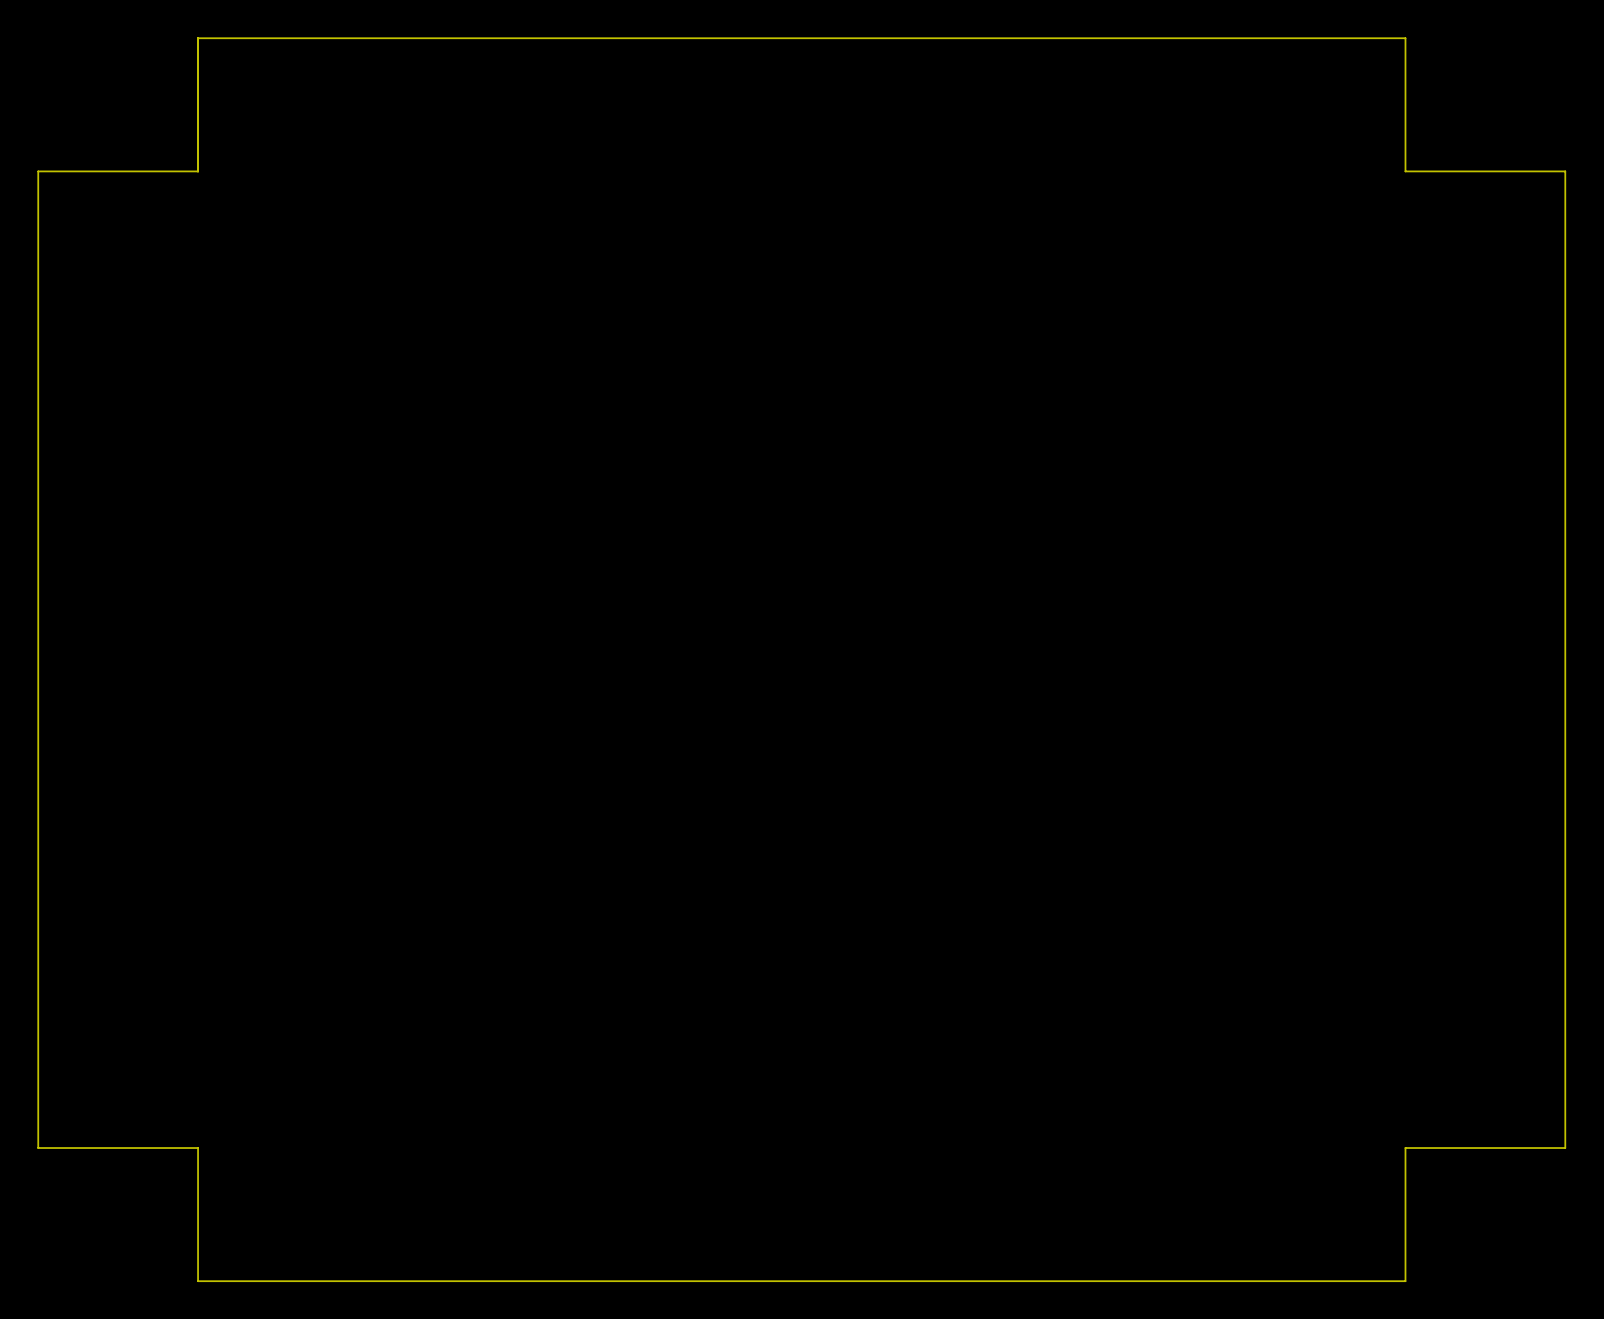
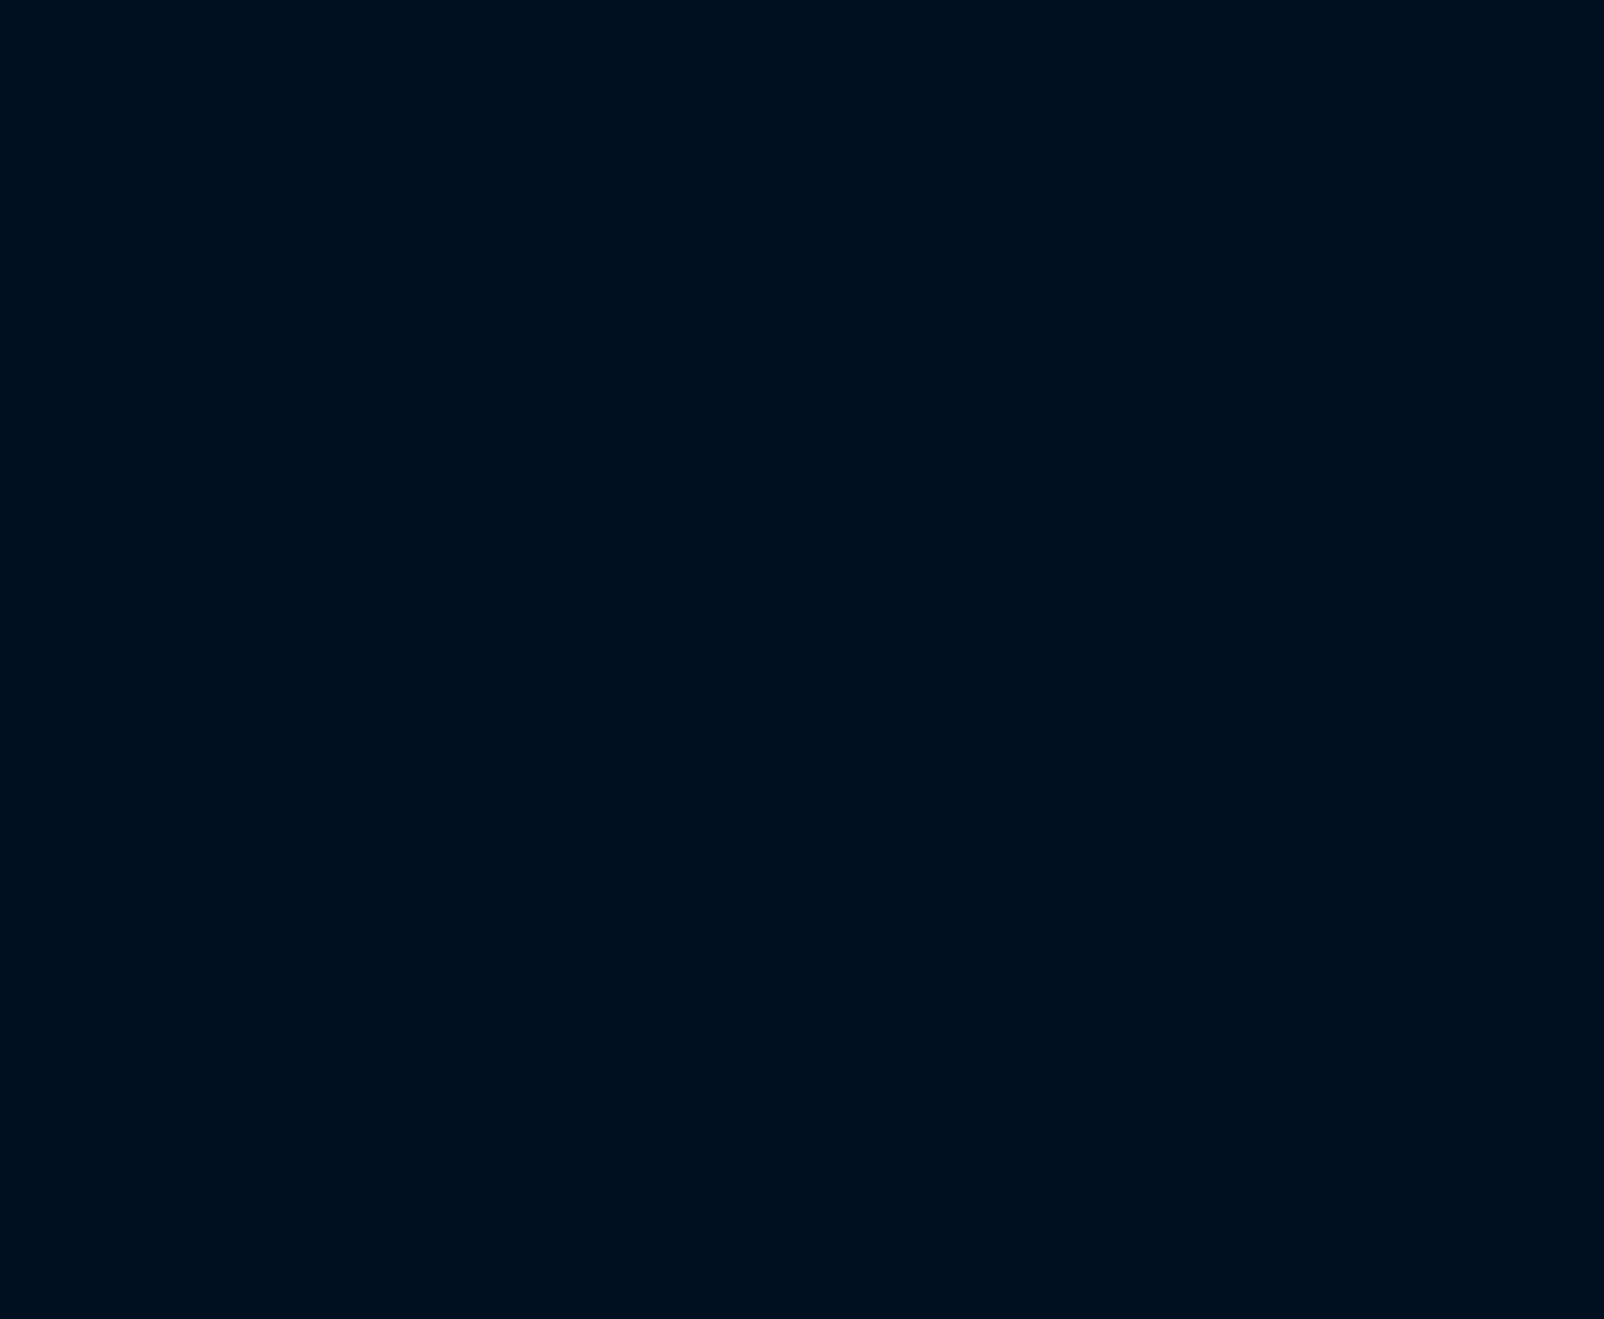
board edge: (198, 38) (198, 171) (38, 171) (38, 1148) (198, 1148) (198, 1281) (1405, 1281) (1405, 1148) (1565, 1148) (1565, 171) (1405, 171) (1405, 38) (198, 38) -> none

